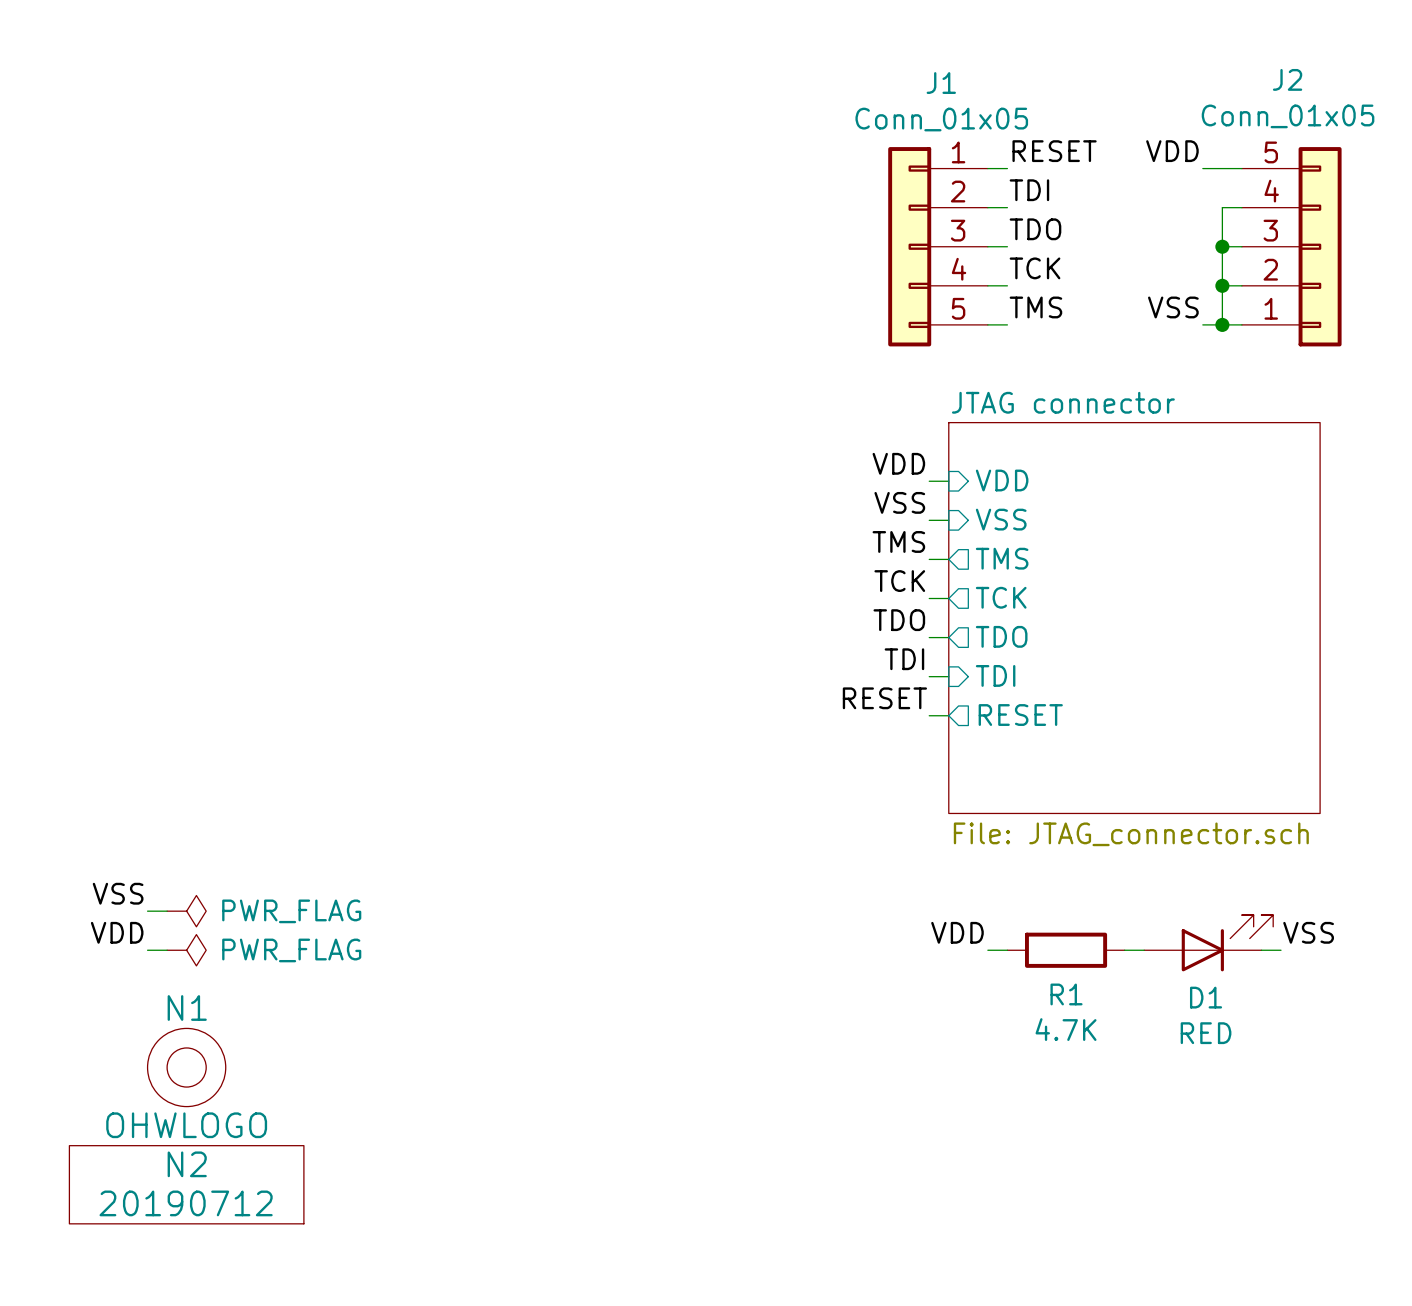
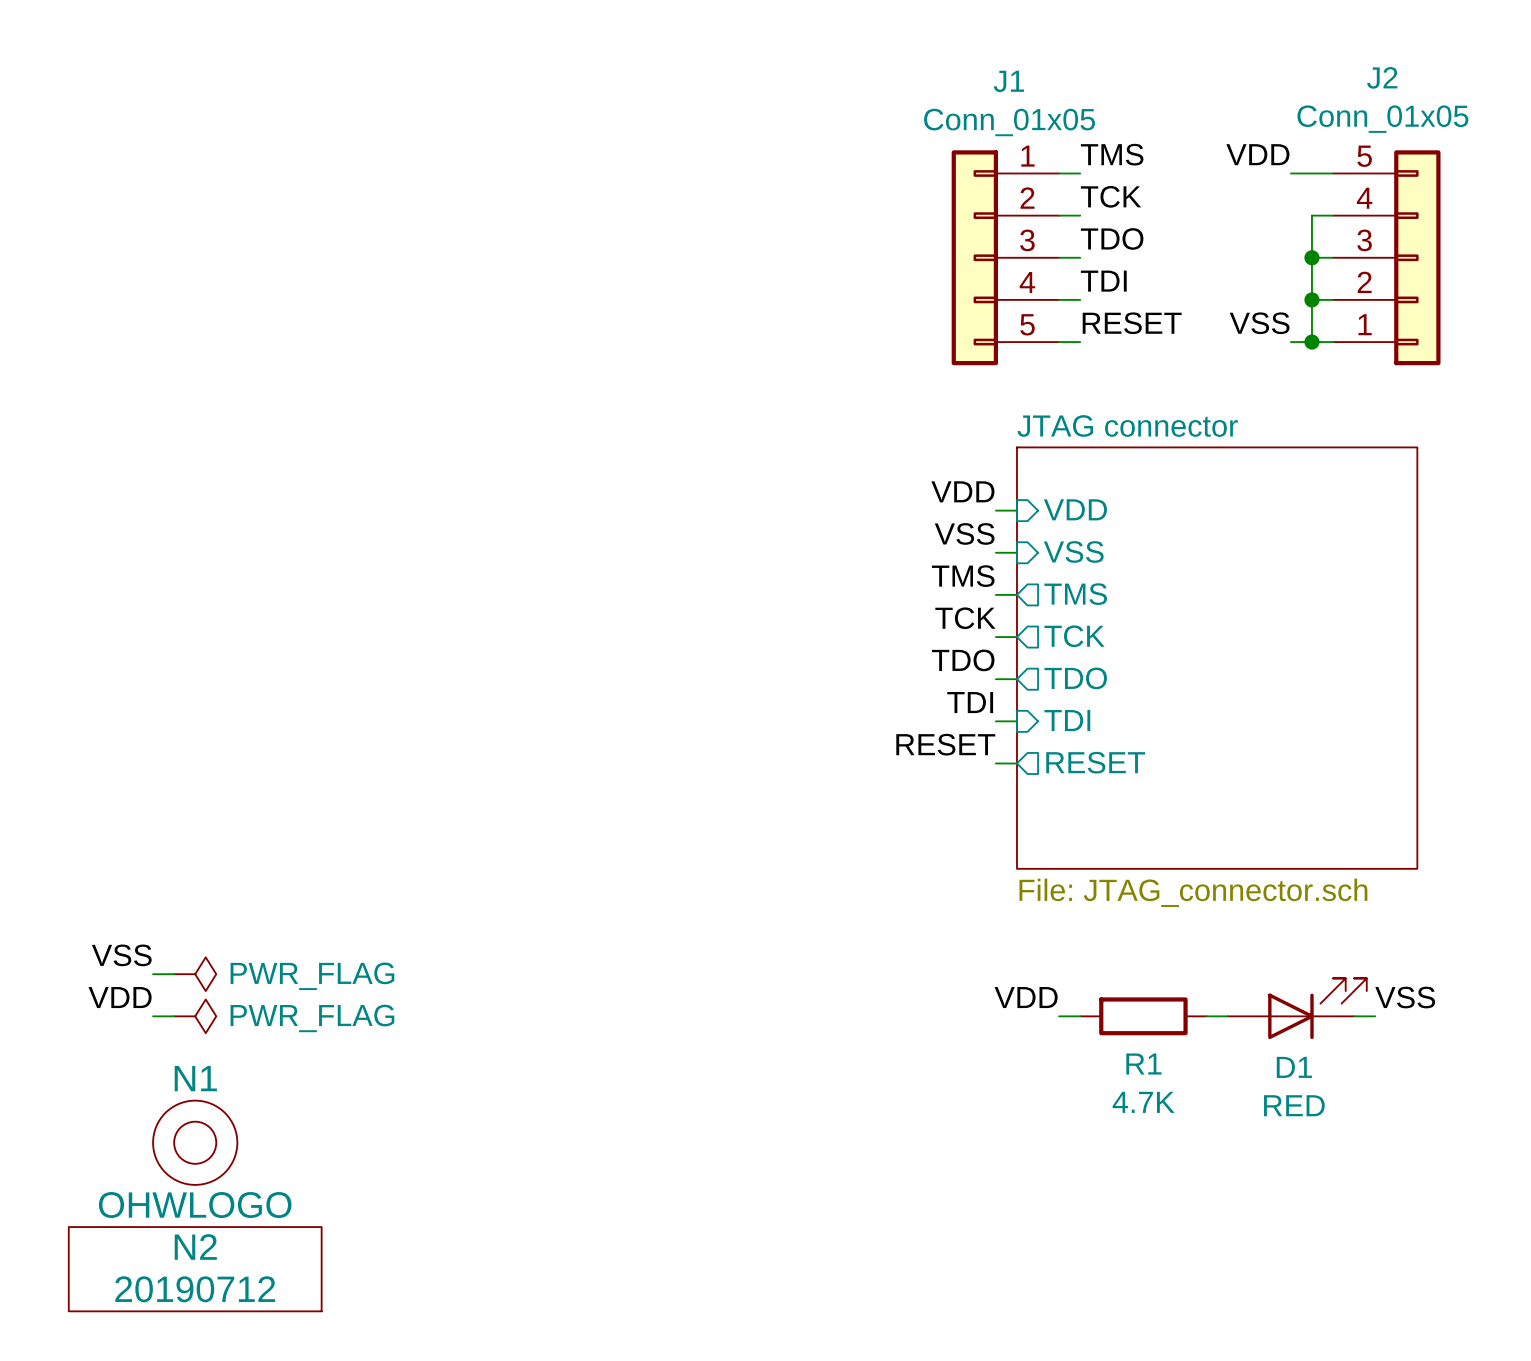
label: RESET (1054, 151) -> TMS (1112, 154)
label: TDI (1029, 190) -> TCK (1111, 196)
label: TCK (1035, 268) -> TDI (1103, 281)
label: TMS (1035, 307) -> RESET (1132, 323)

